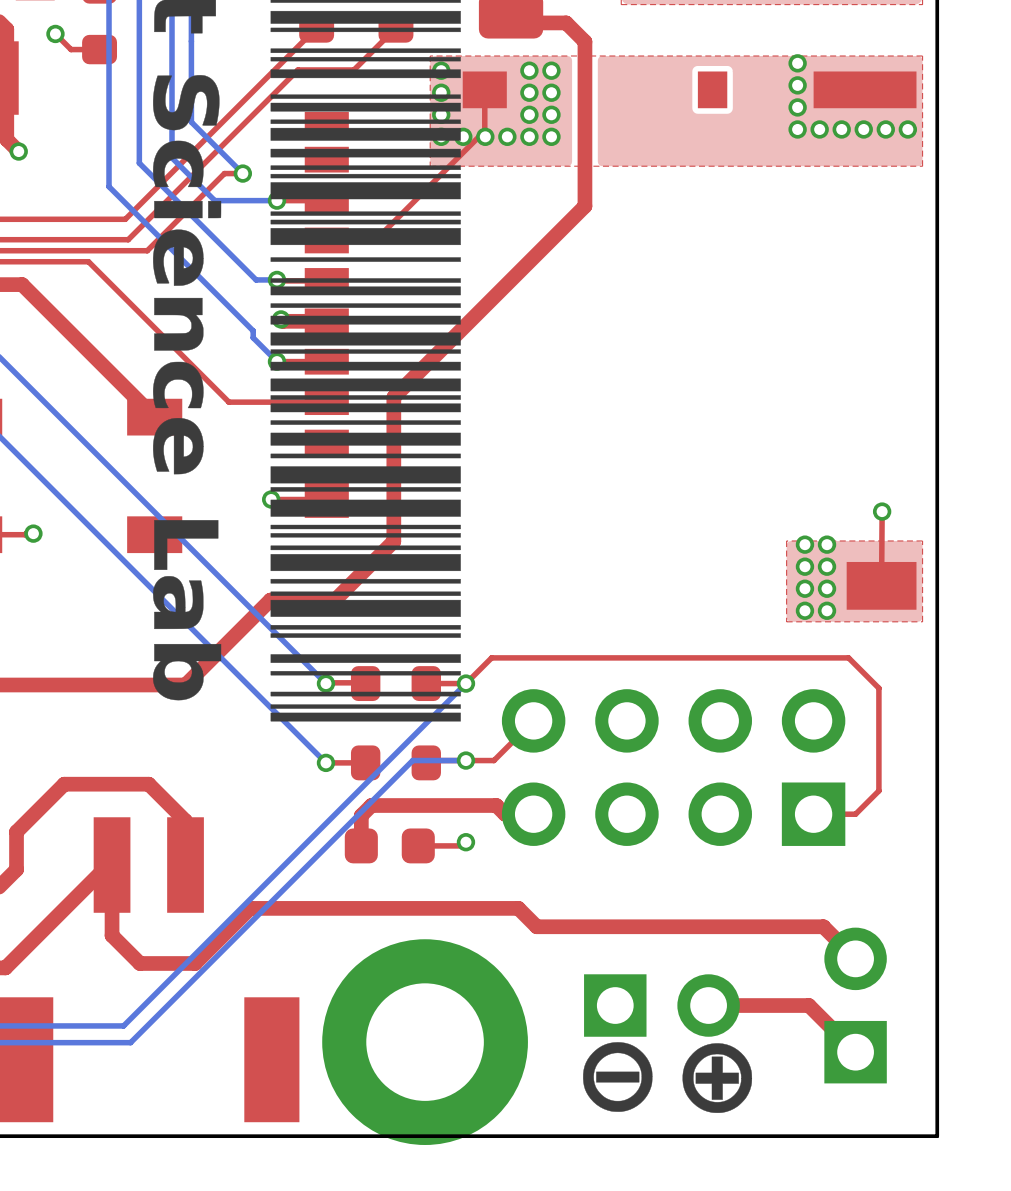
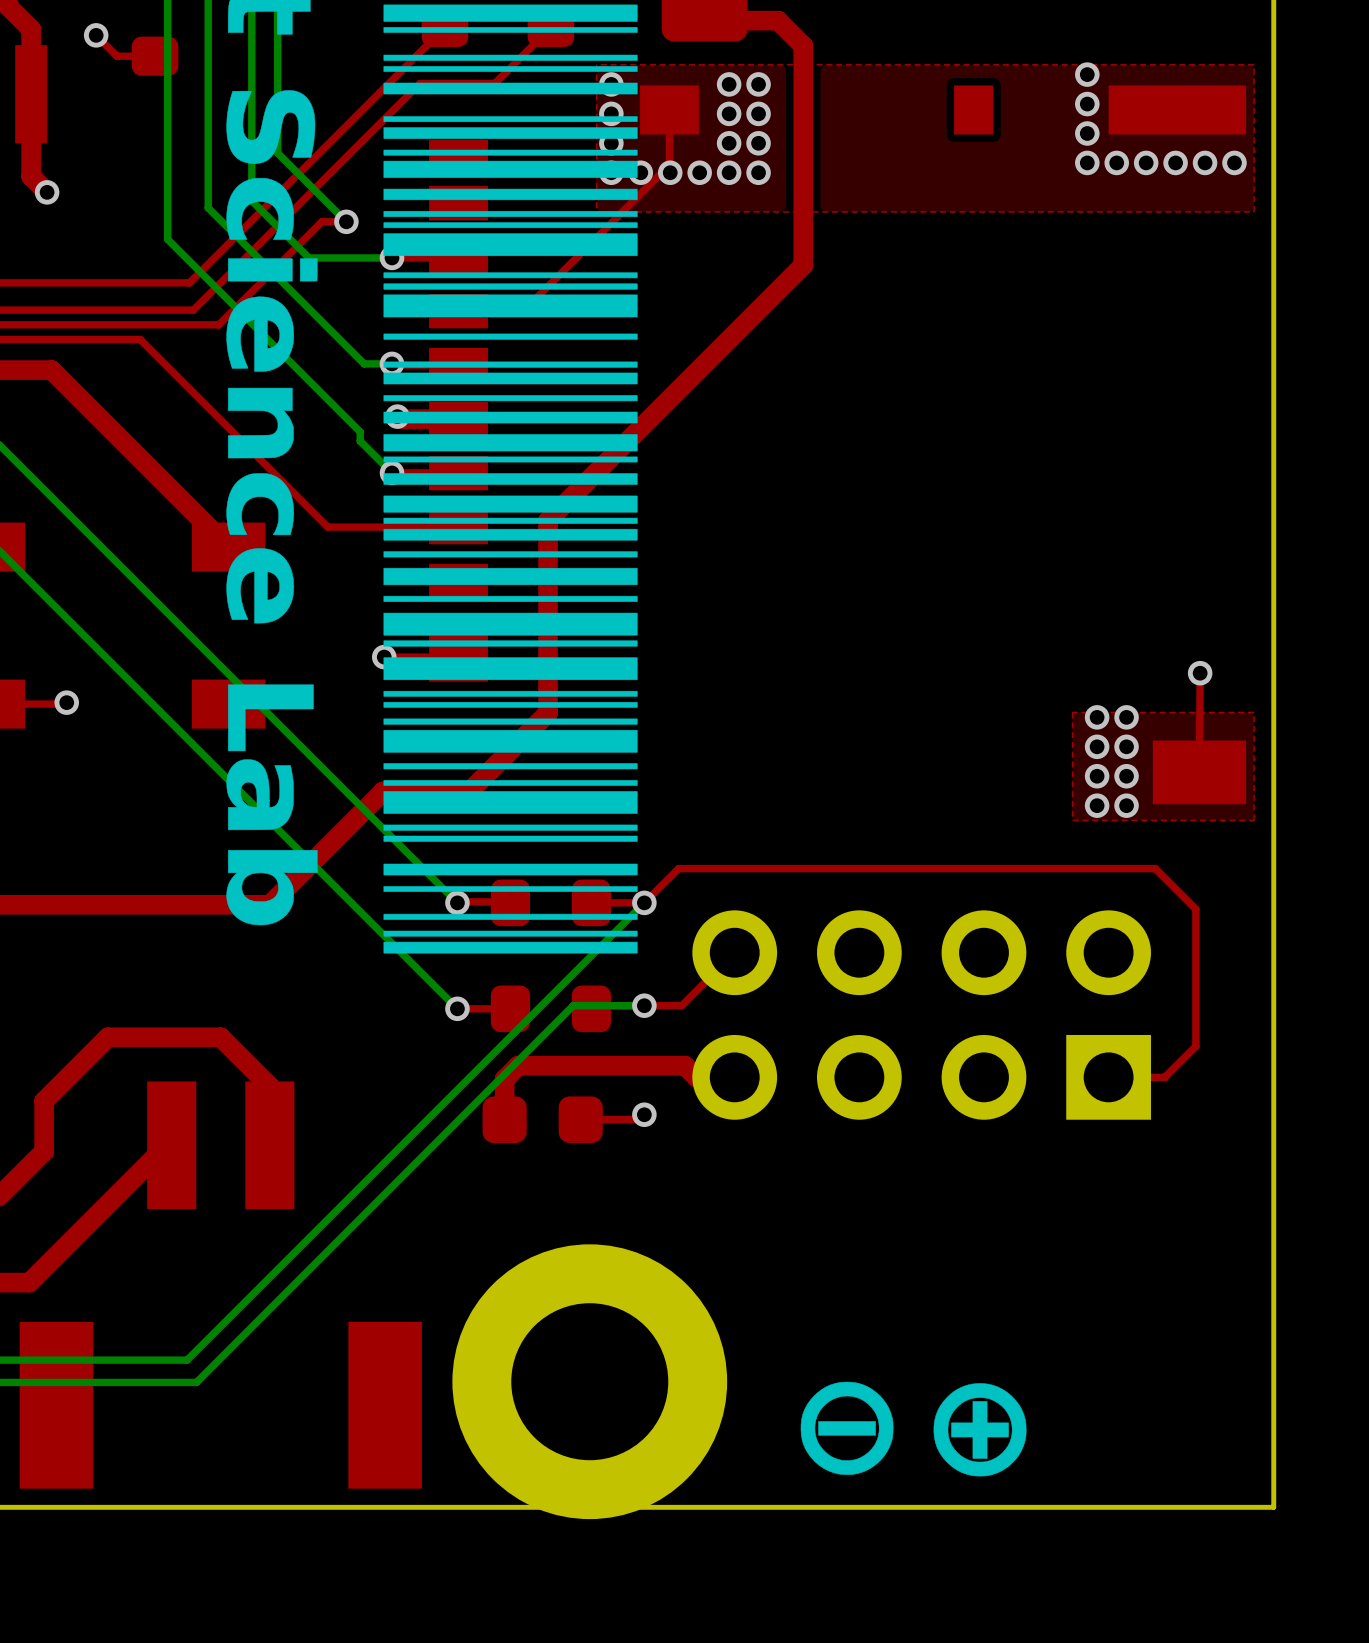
top track: (112, 865) (112, 935) (139, 963) (195, 963) (250, 908) (518, 908) (536, 926) (823, 926) (855, 958) -> none
part: (661, 1005) -> none
top track: (708, 1005) (808, 1005) (855, 1052) -> none
part: (855, 1005) -> none

